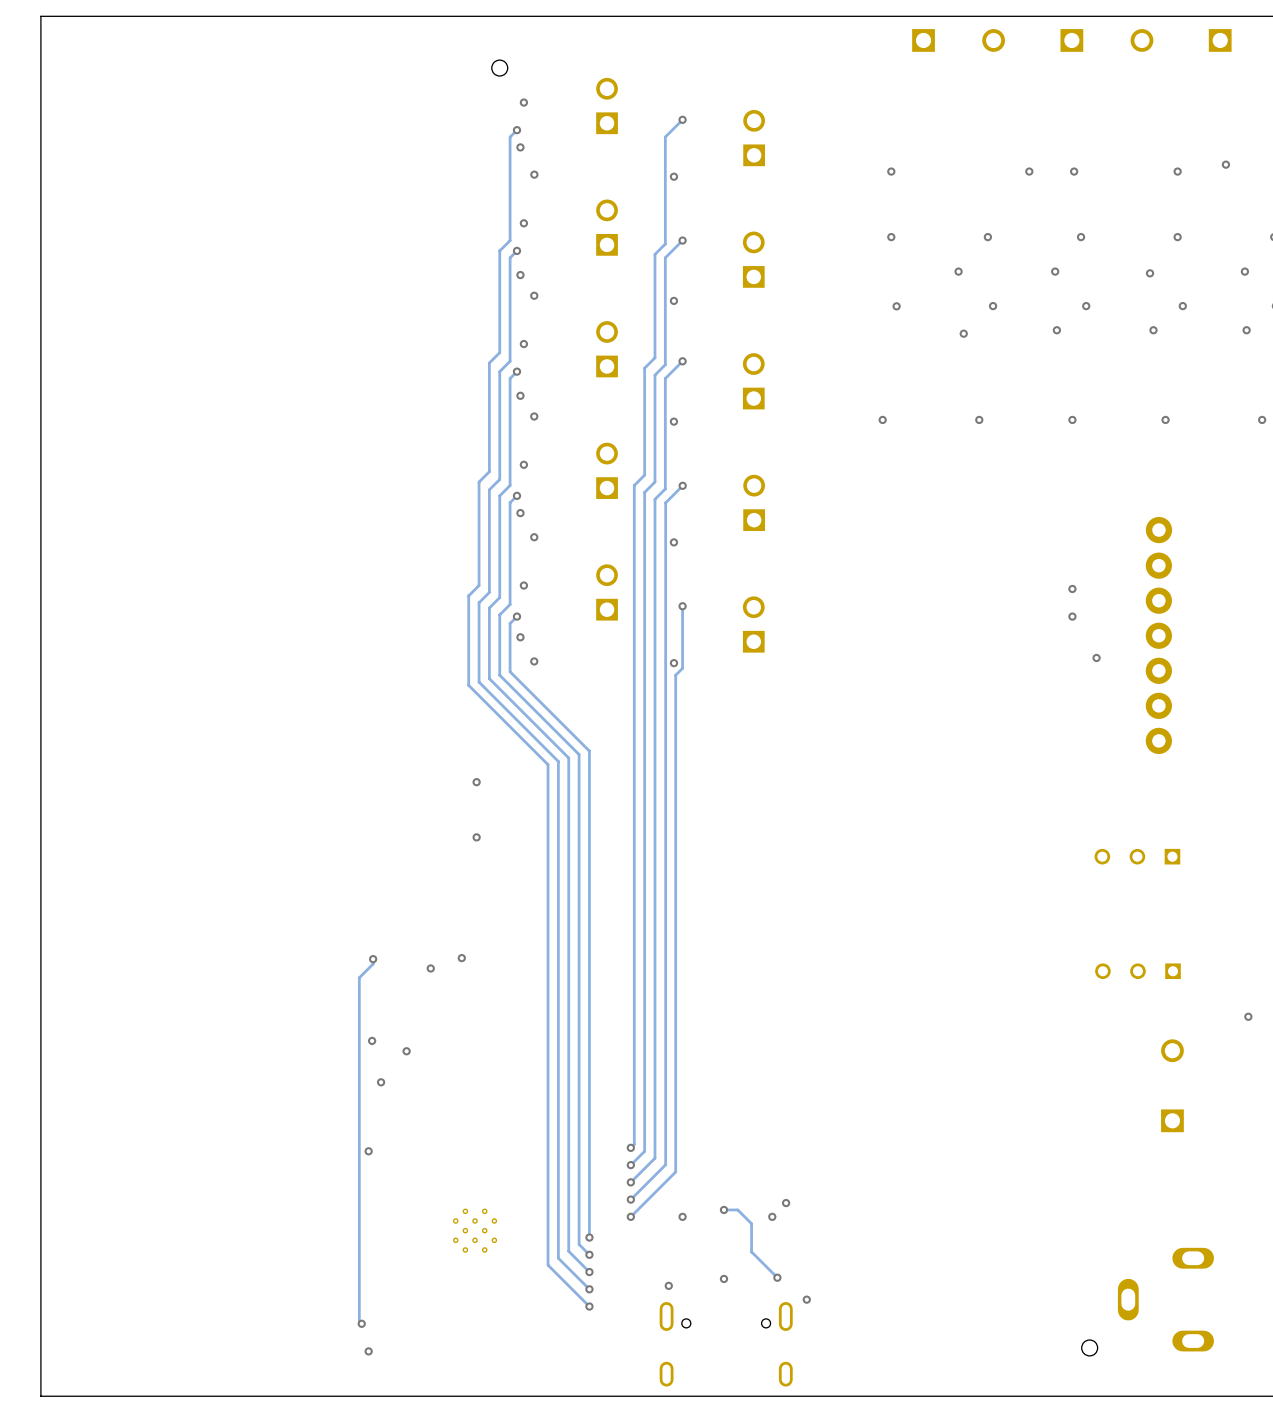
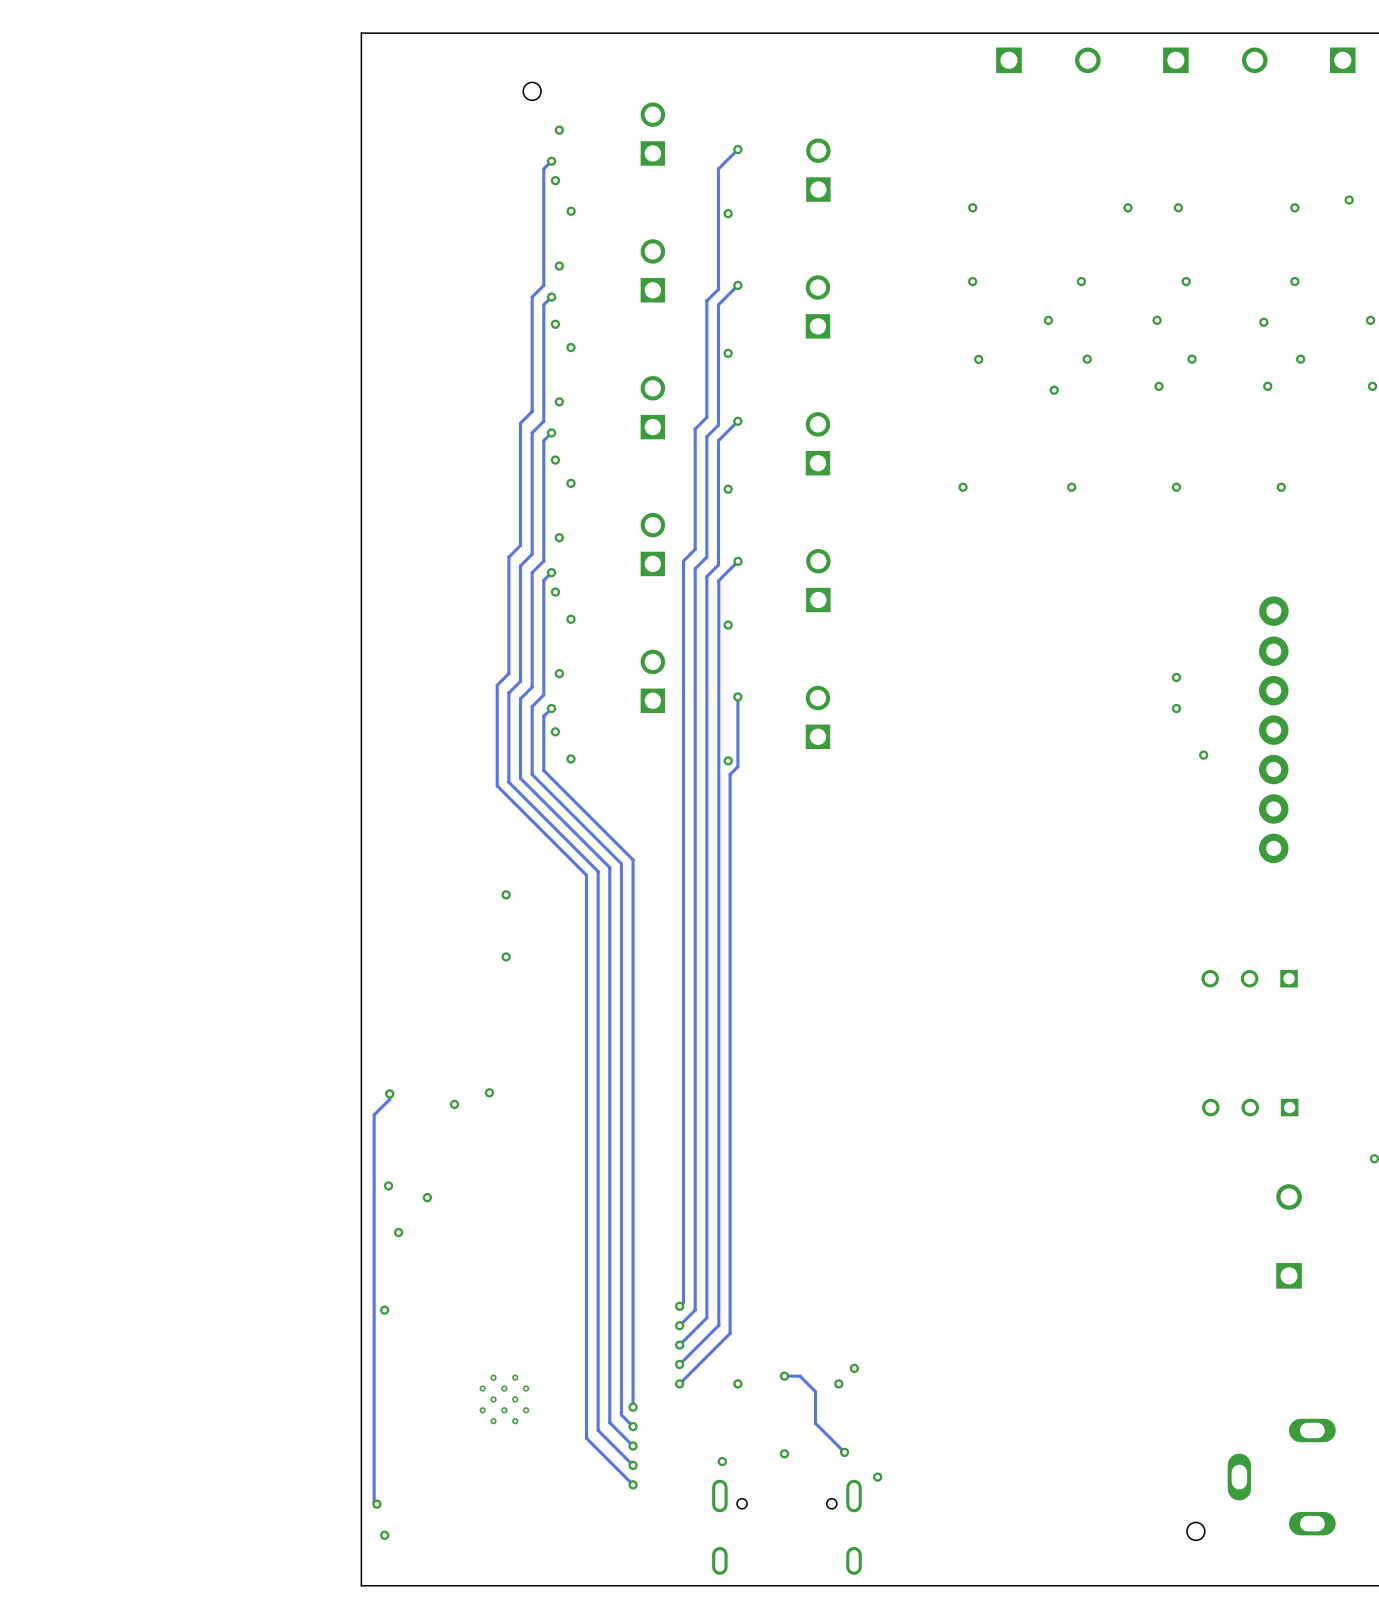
board edge: (347, 16) (40, 16) (40, 1396) (347, 1396) -> (361, 33) (361, 1585)

